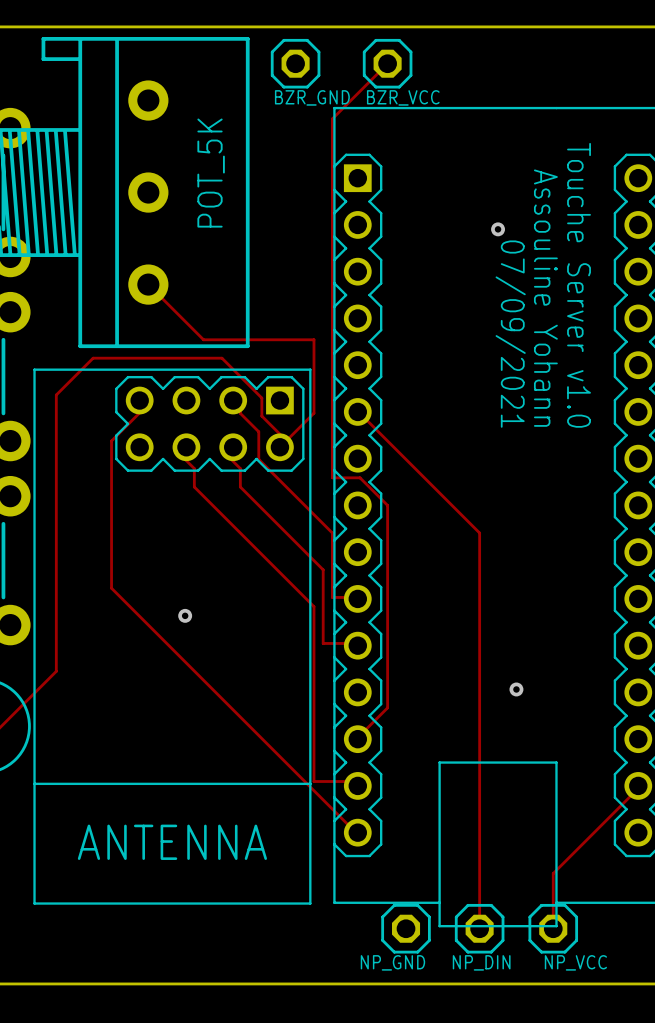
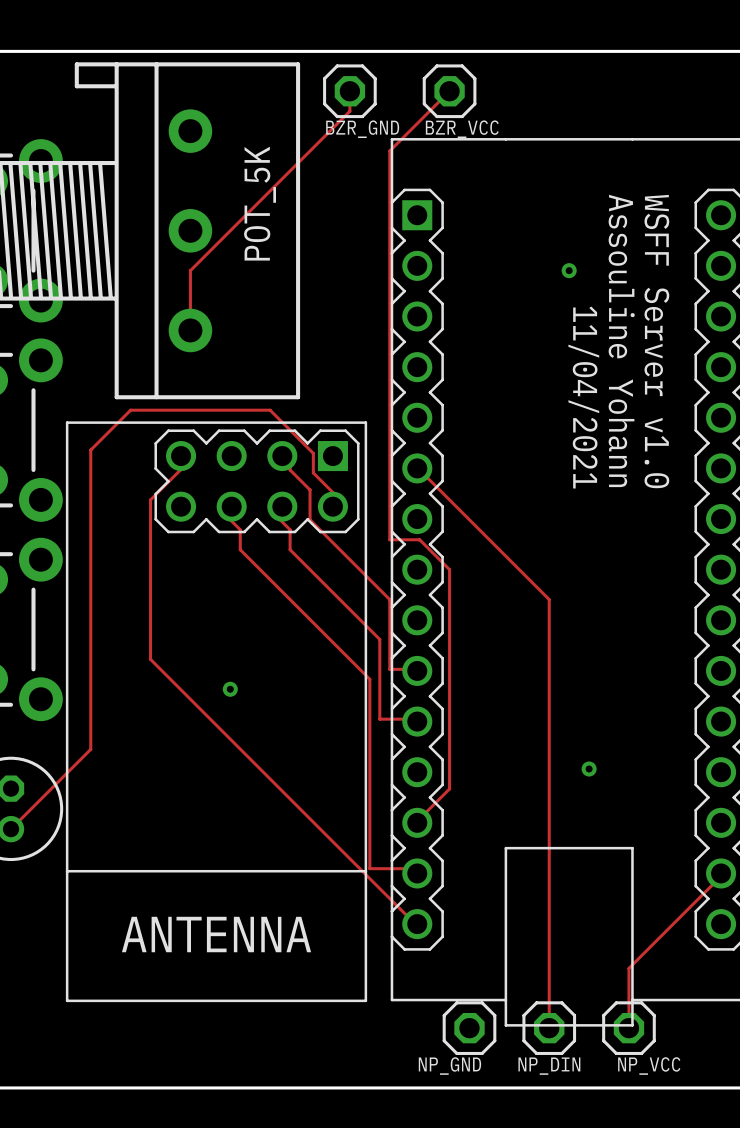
track: (148, 284) (203, 339) (313, 339) (313, 413) (279, 447) -> (190, 330) (190, 270) (349, 111) (349, 91)
text: Touche Server v1.0 (579, 285) -> WSFF Server v1.0 (656, 341)
text: 07/09/2021 (510, 334) -> 11/04/2021 (583, 397)

